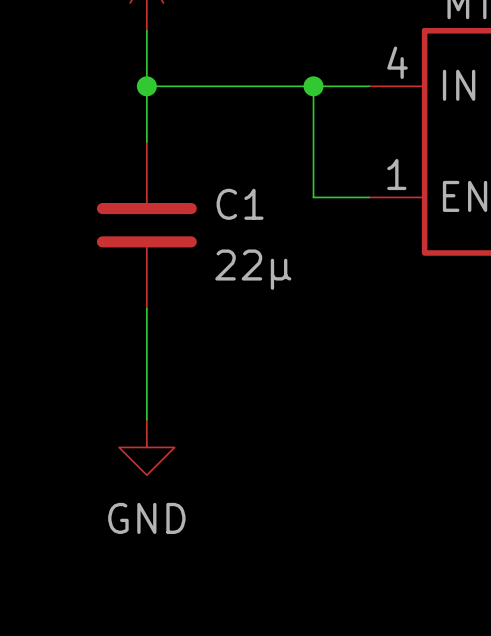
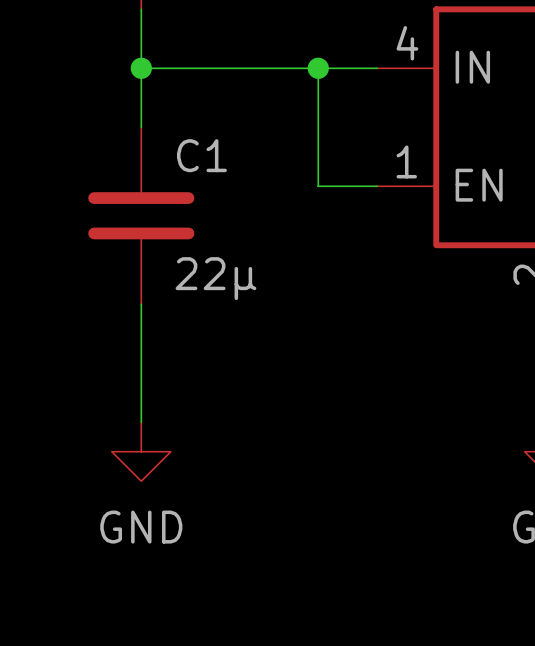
C1 name position: C1 (240, 204) -> C1 (201, 155)
C1 value position: 22µ (253, 269) -> 22µ (215, 278)

